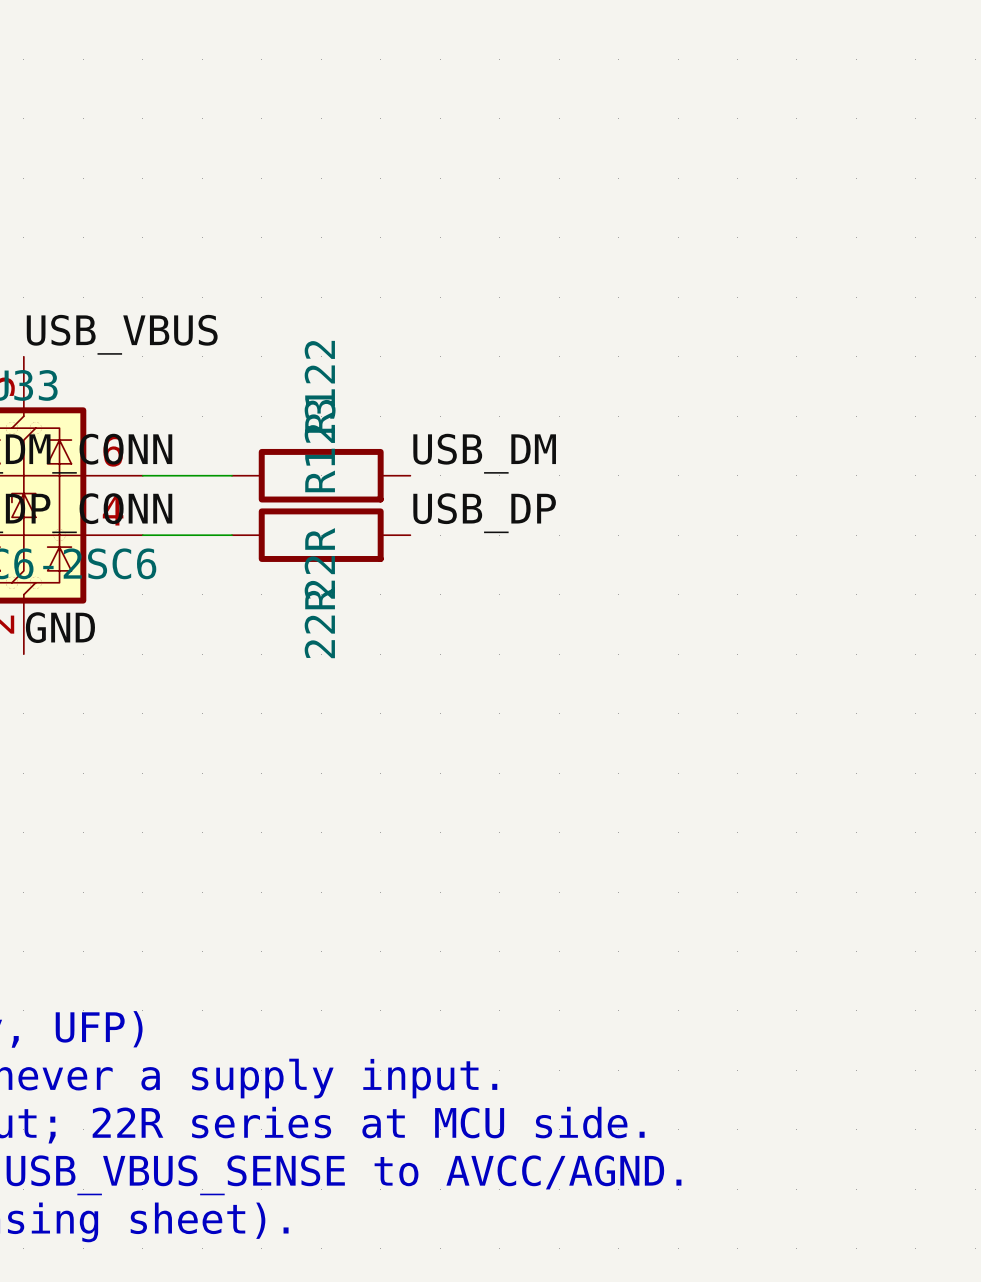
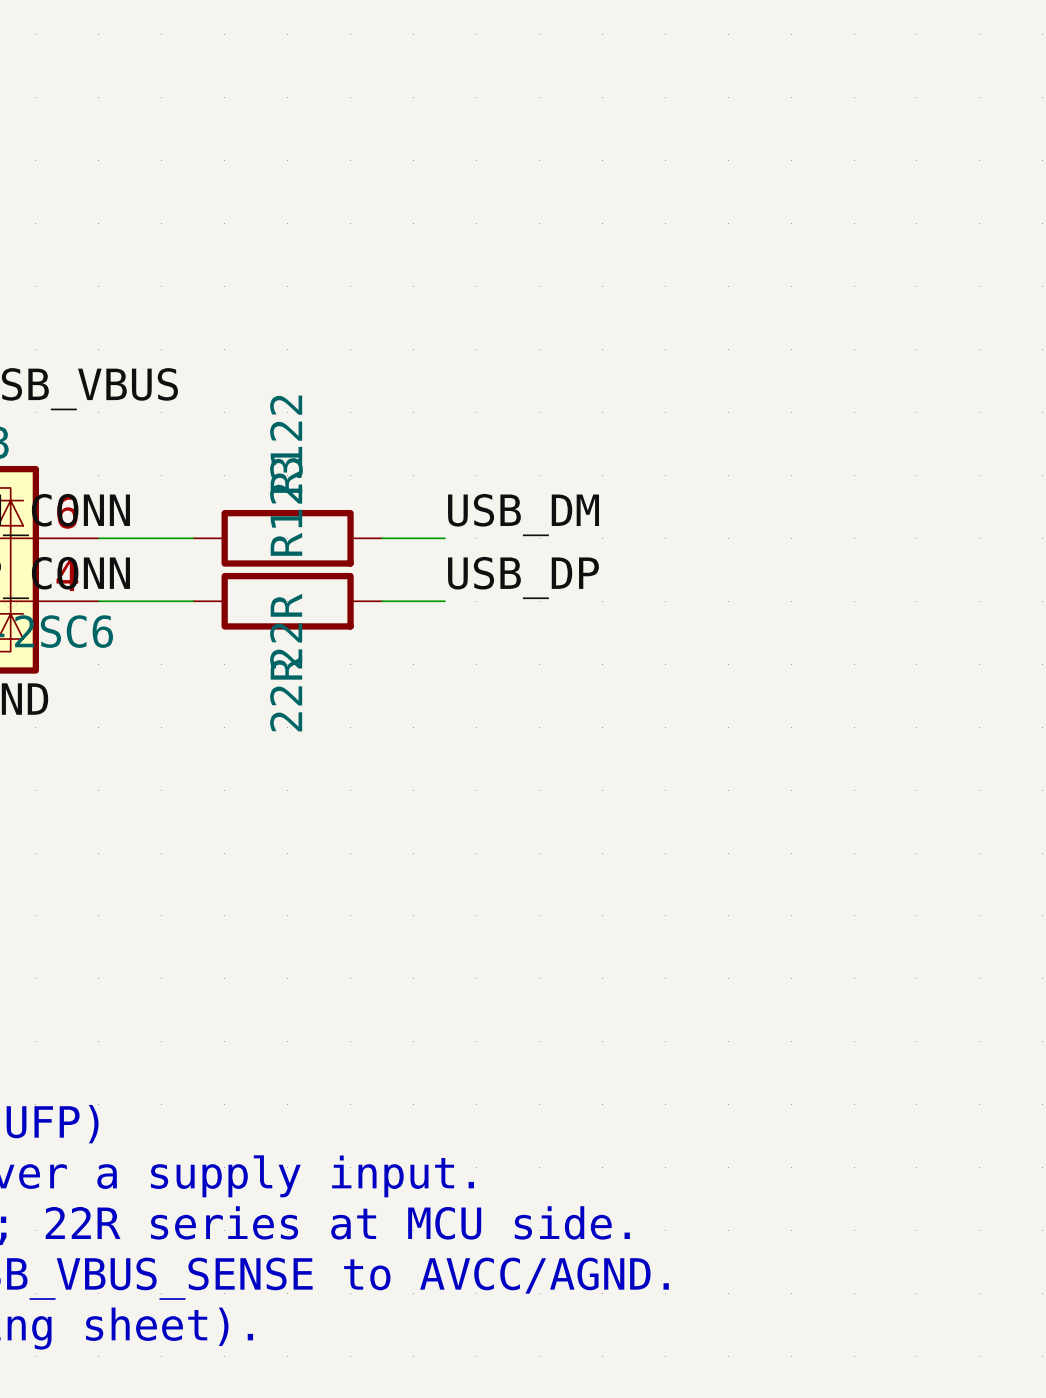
label position: USB_DM (484, 453) -> USB_DM (523, 515)
wire: none -> (382, 538) (444, 538)
label position: USB_DP (484, 513) -> USB_DP (523, 577)
wire: none -> (382, 601) (444, 601)

